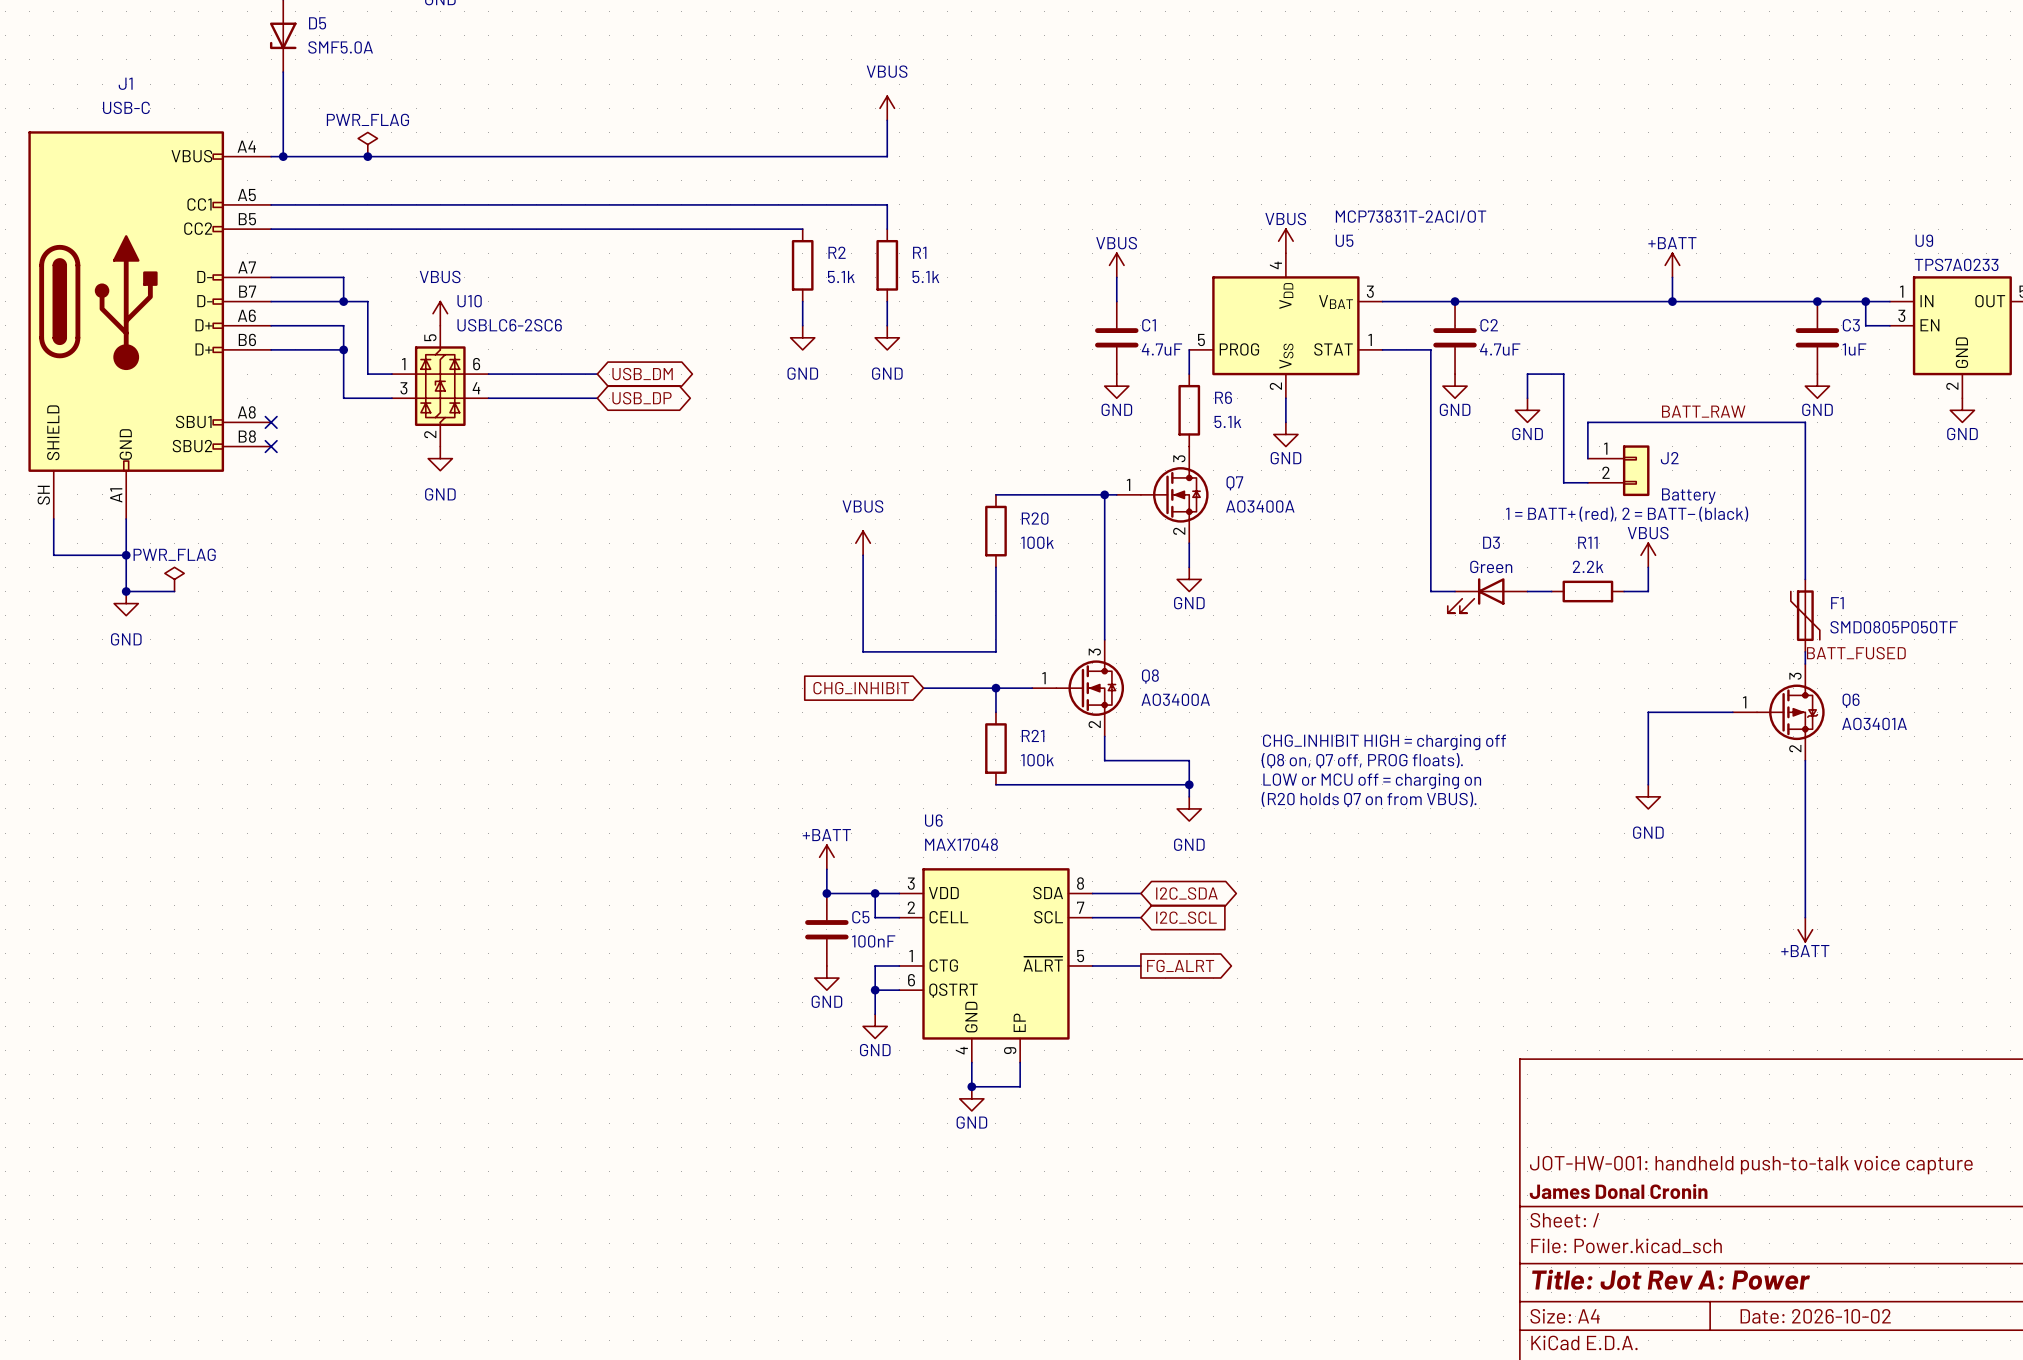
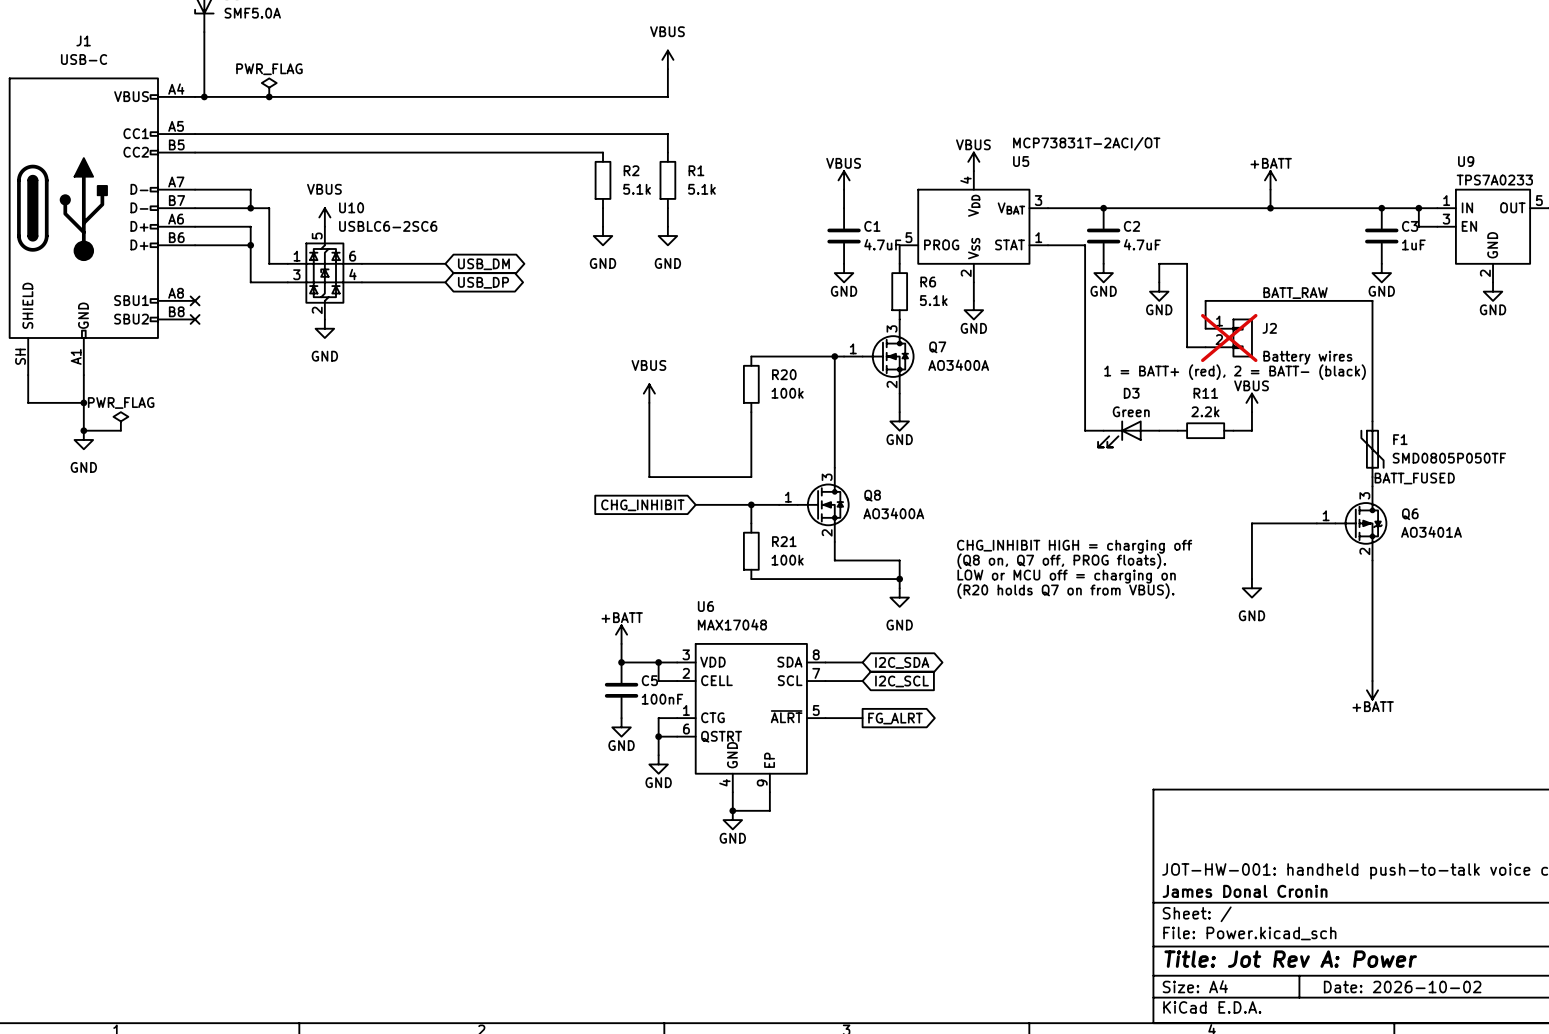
J2 do-not-place cross: none -> (1229, 338)
J2 value: Battery (1688, 496) -> Battery wires (1307, 357)

